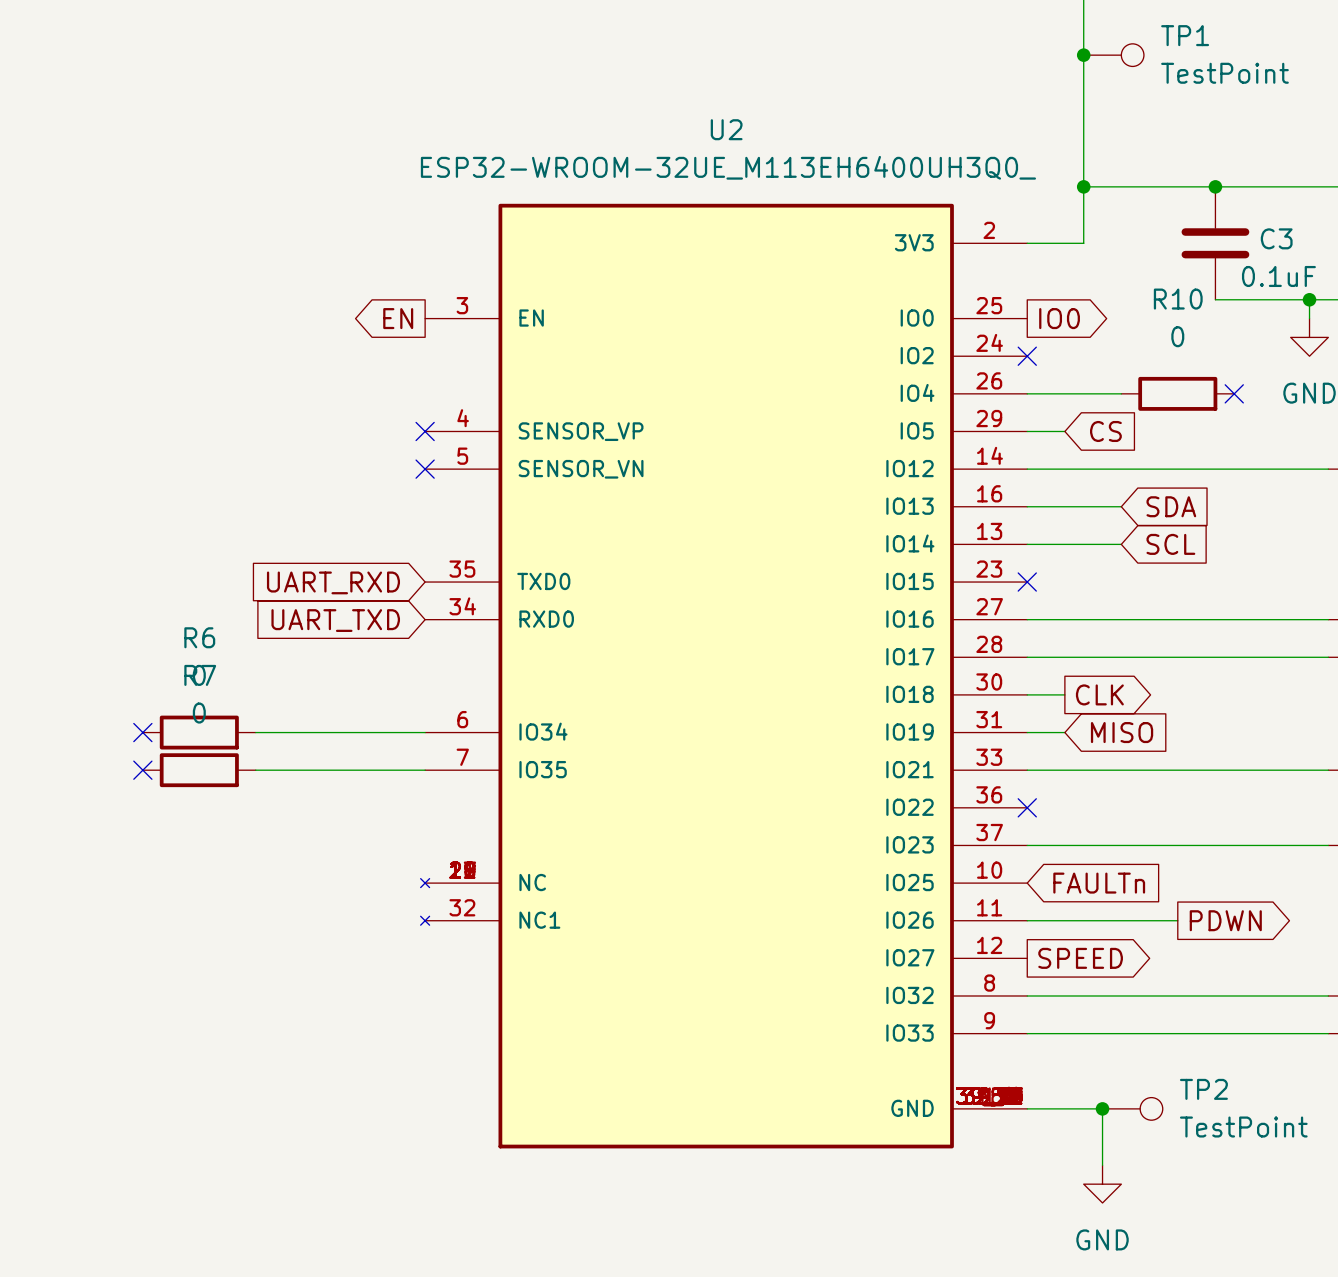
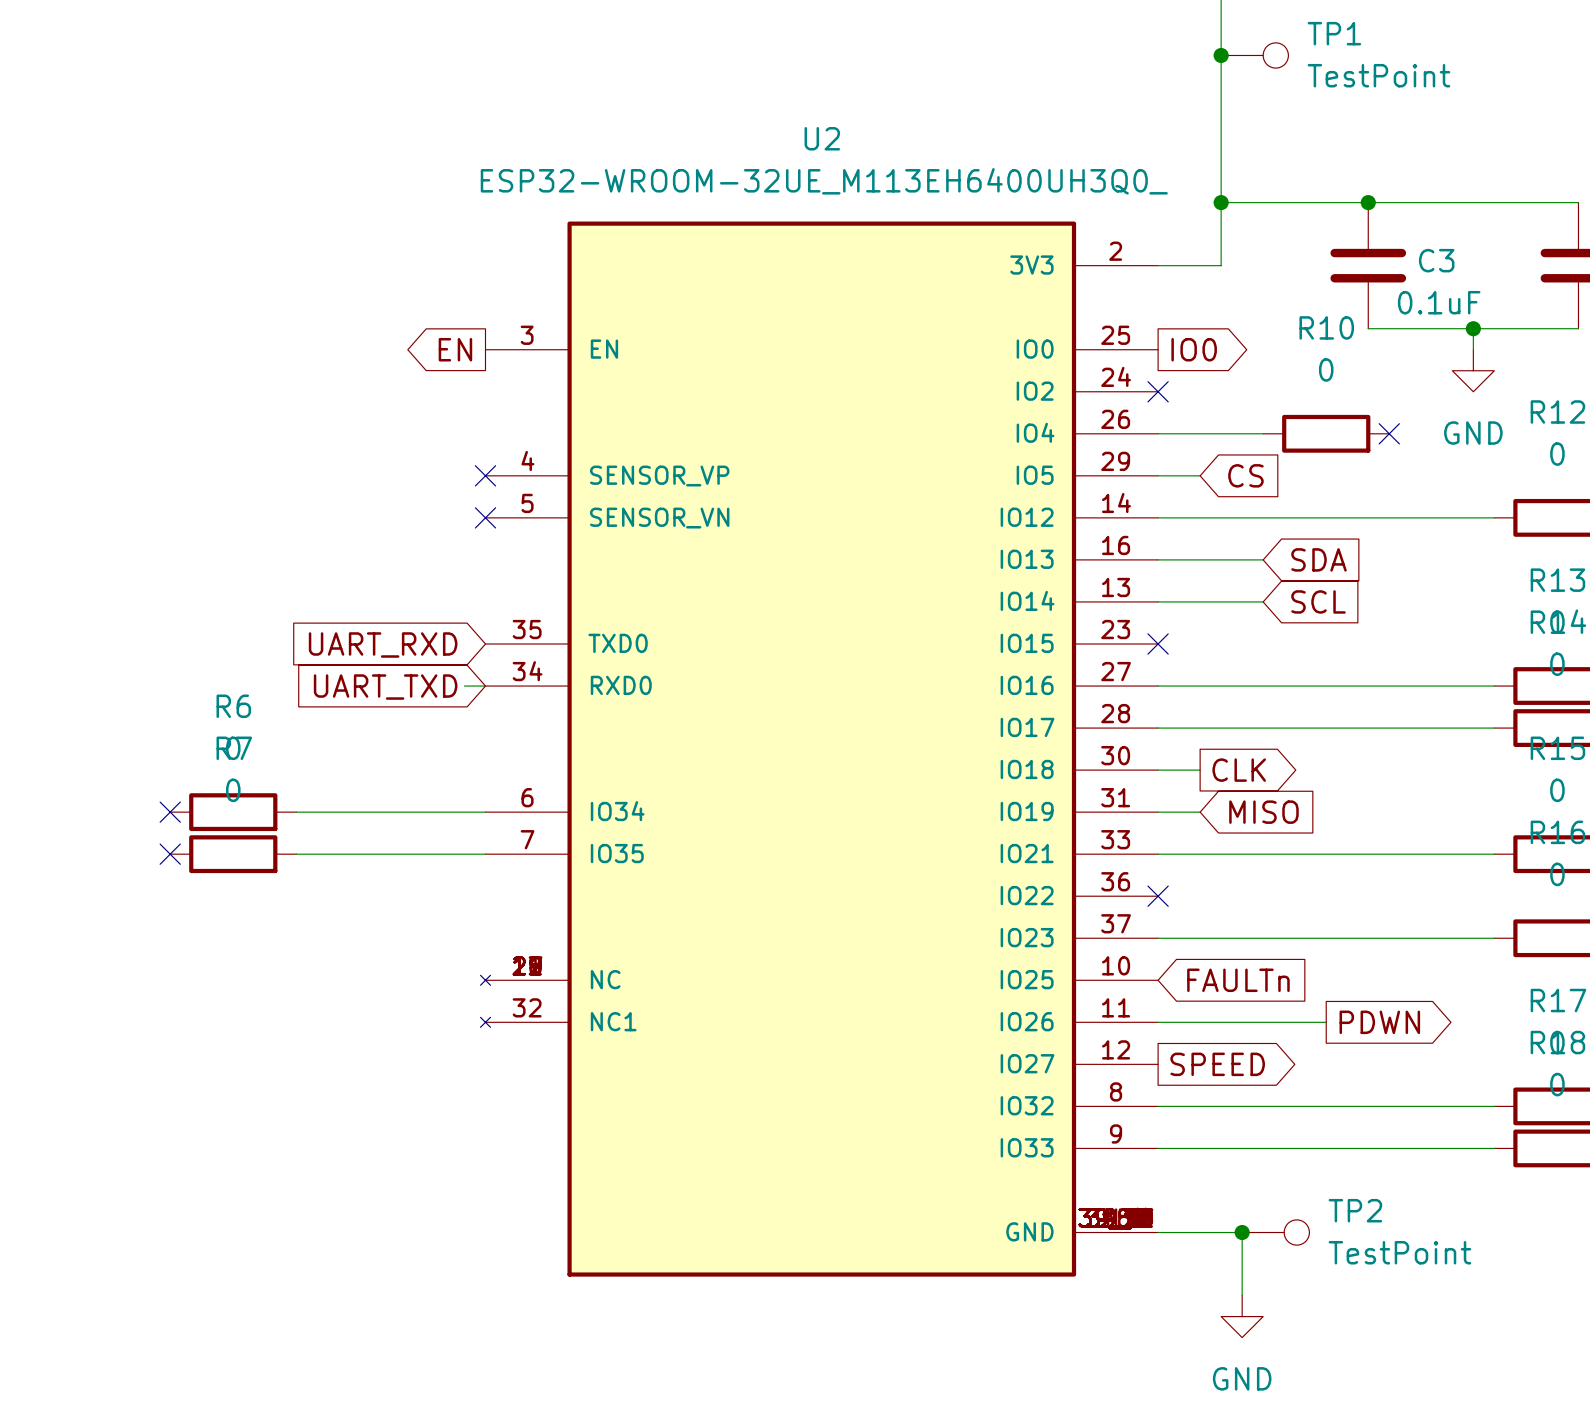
wire: none -> (464, 686) (485, 686)

